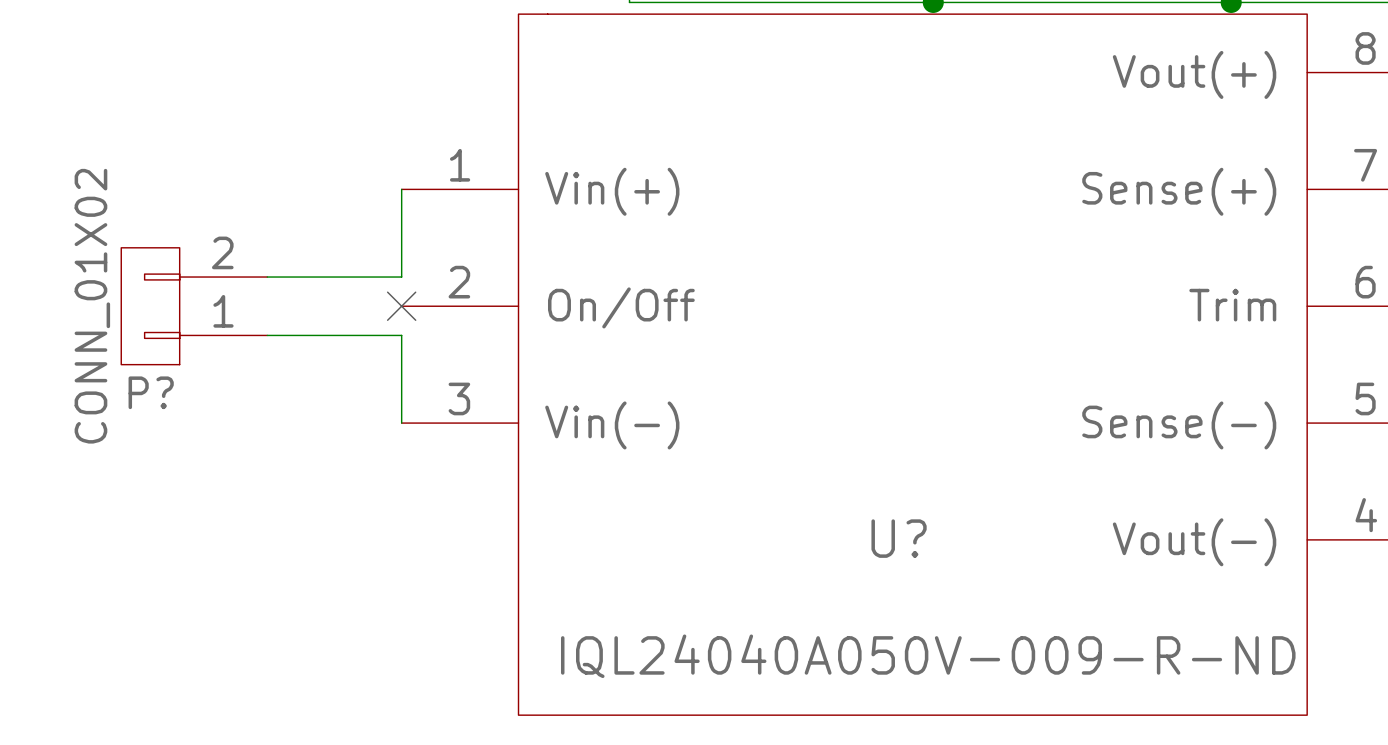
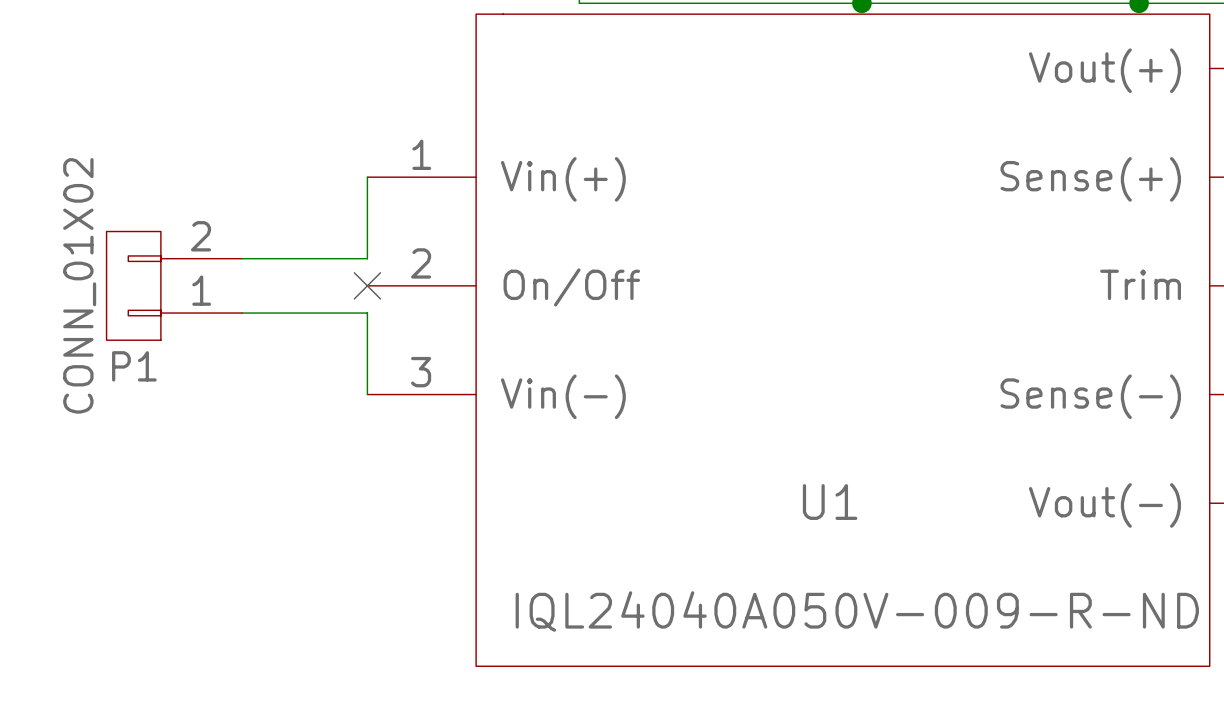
P? name: P? (151, 392) -> P1 (134, 366)
U? name: U? (899, 538) -> U1 (830, 502)

